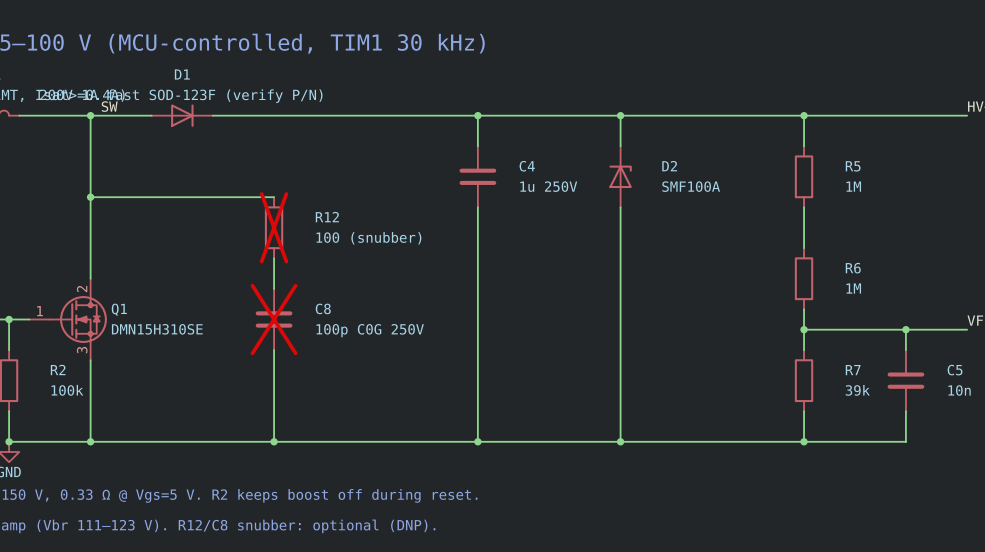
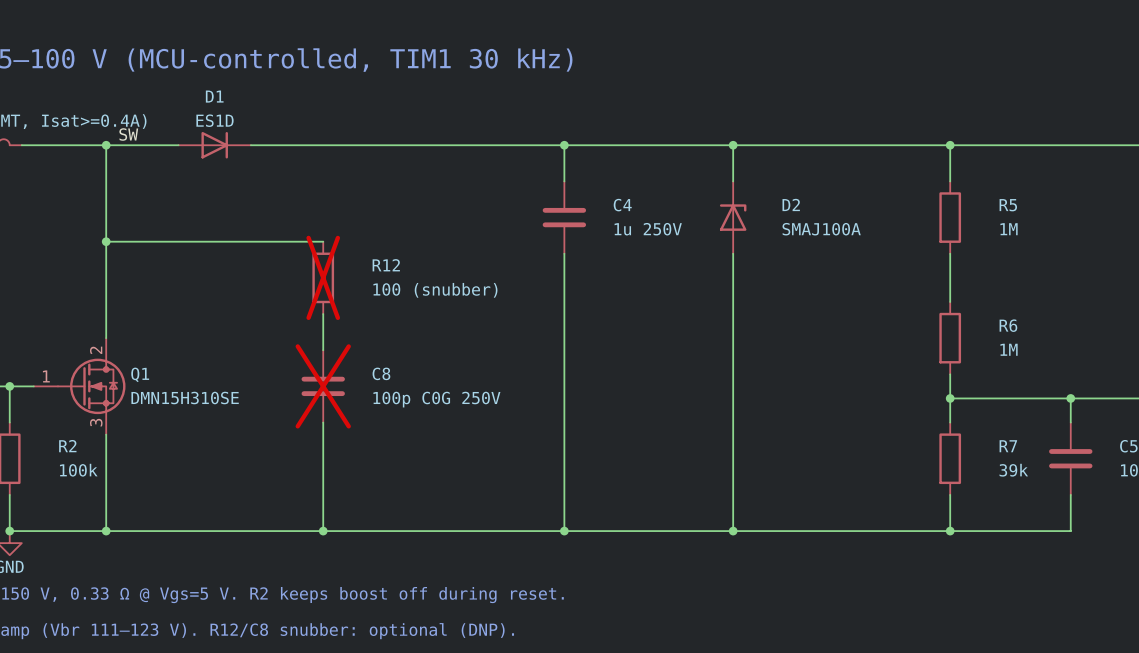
D1 value: 200V 1A fast SOD-123F (verify P/N) (181, 96) -> ES1D (215, 120)
D2 value: SMF100A (691, 186) -> SMAJ100A (821, 229)

